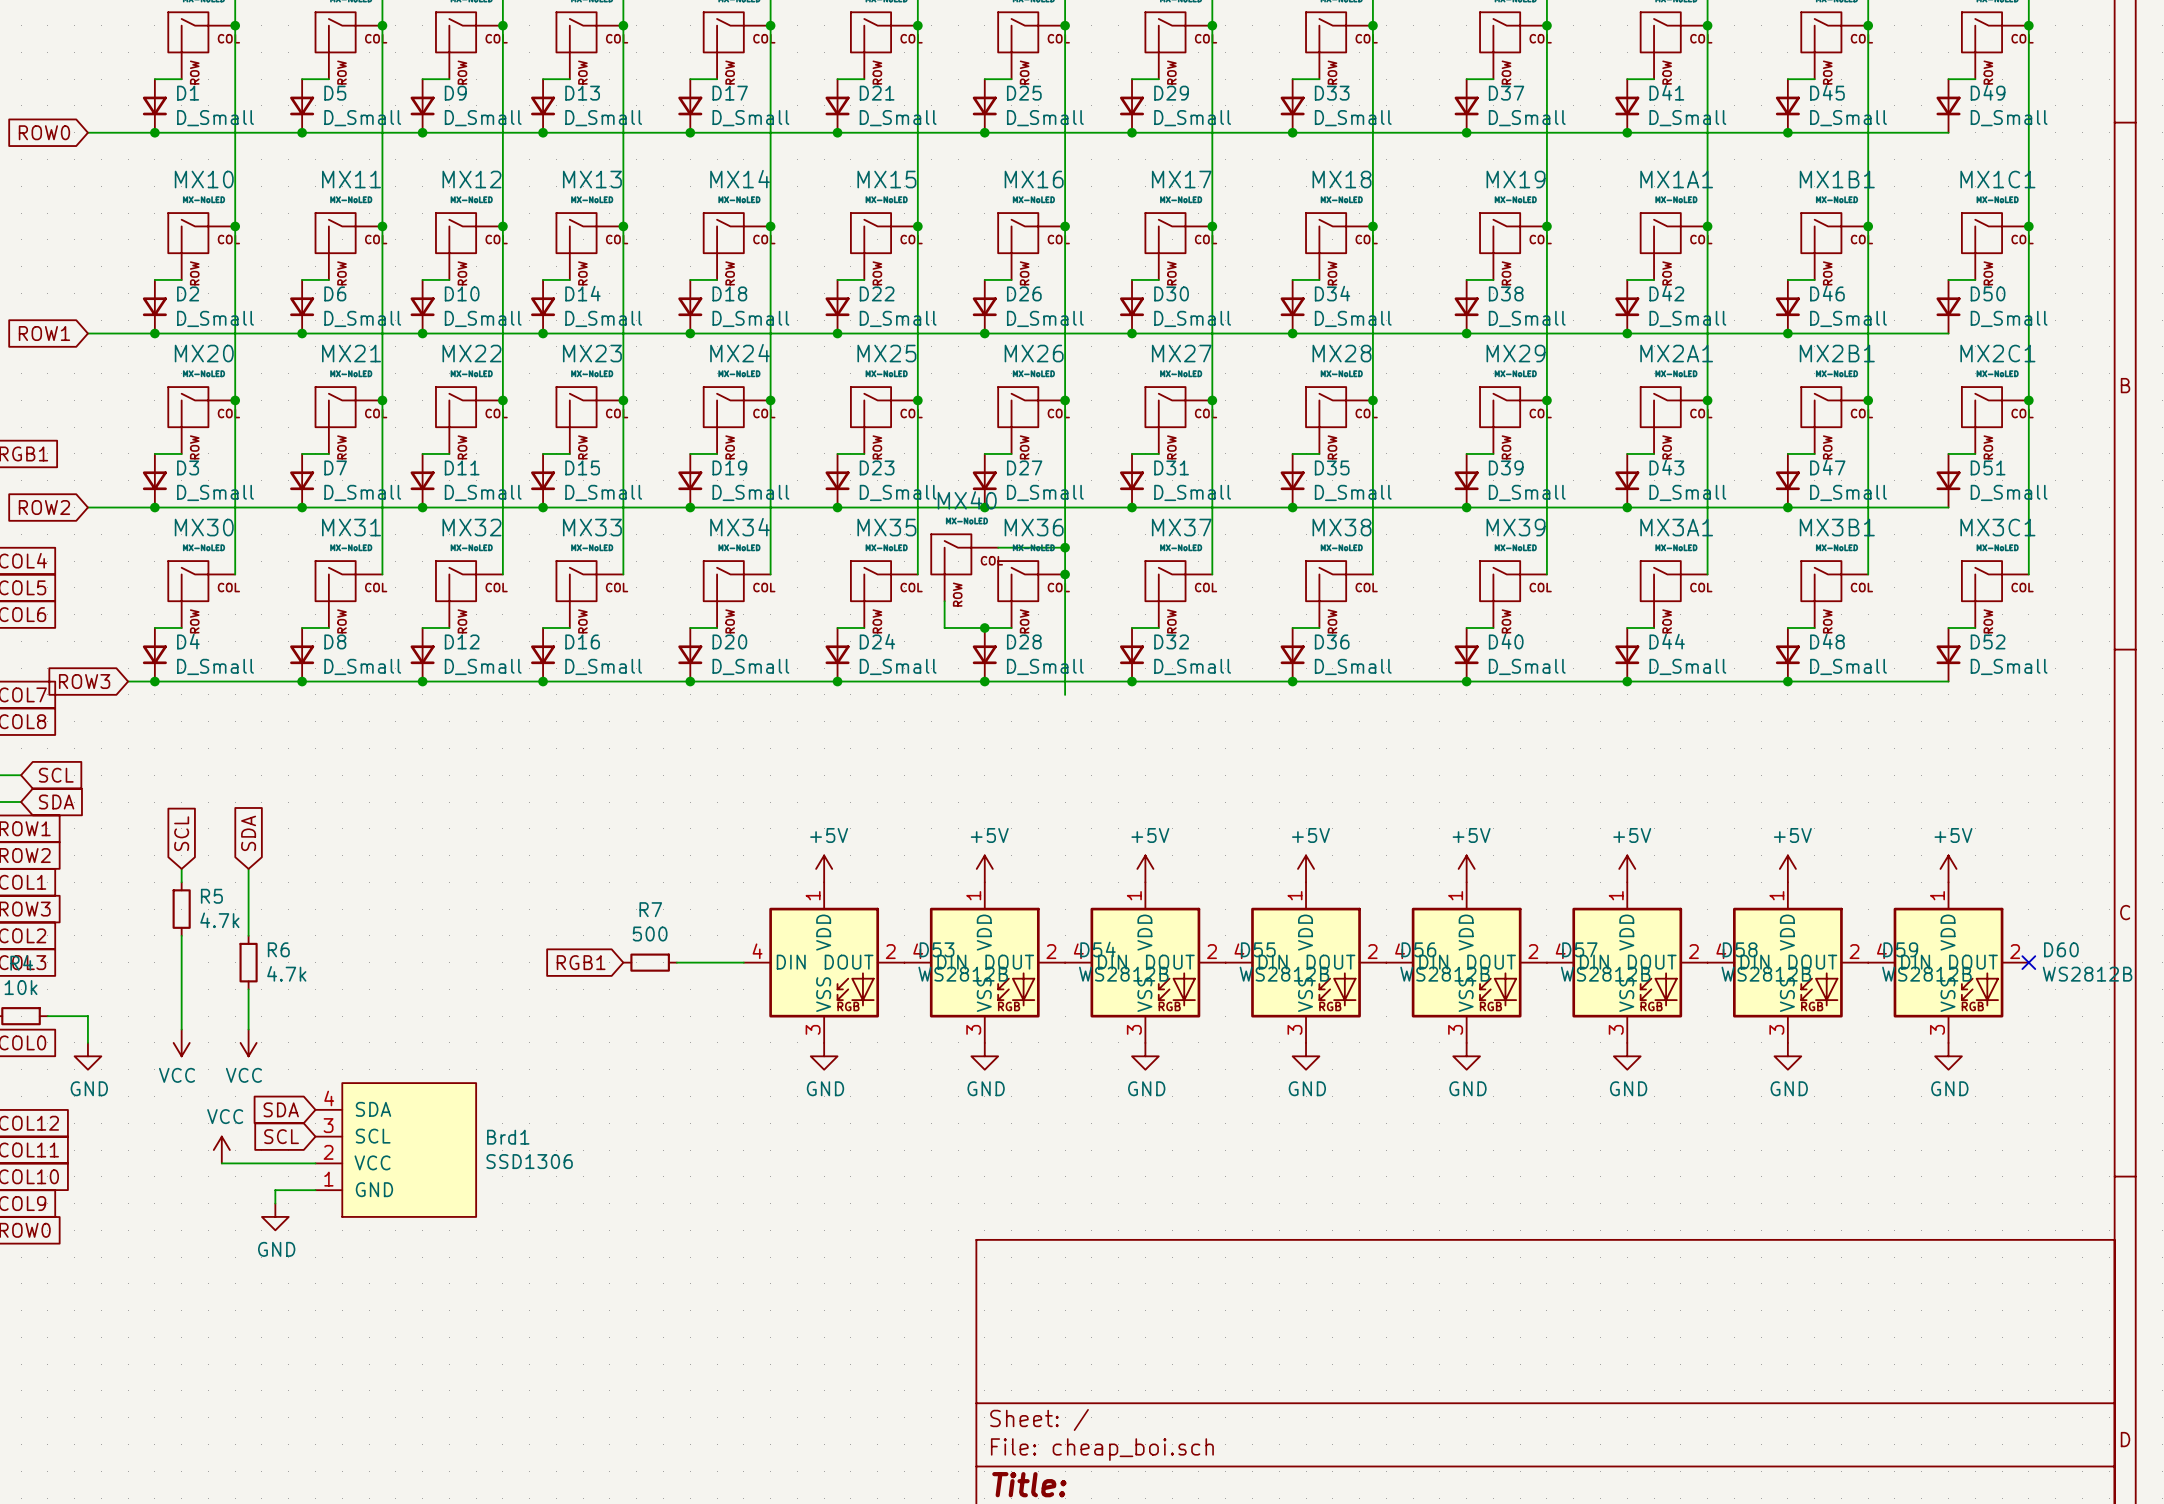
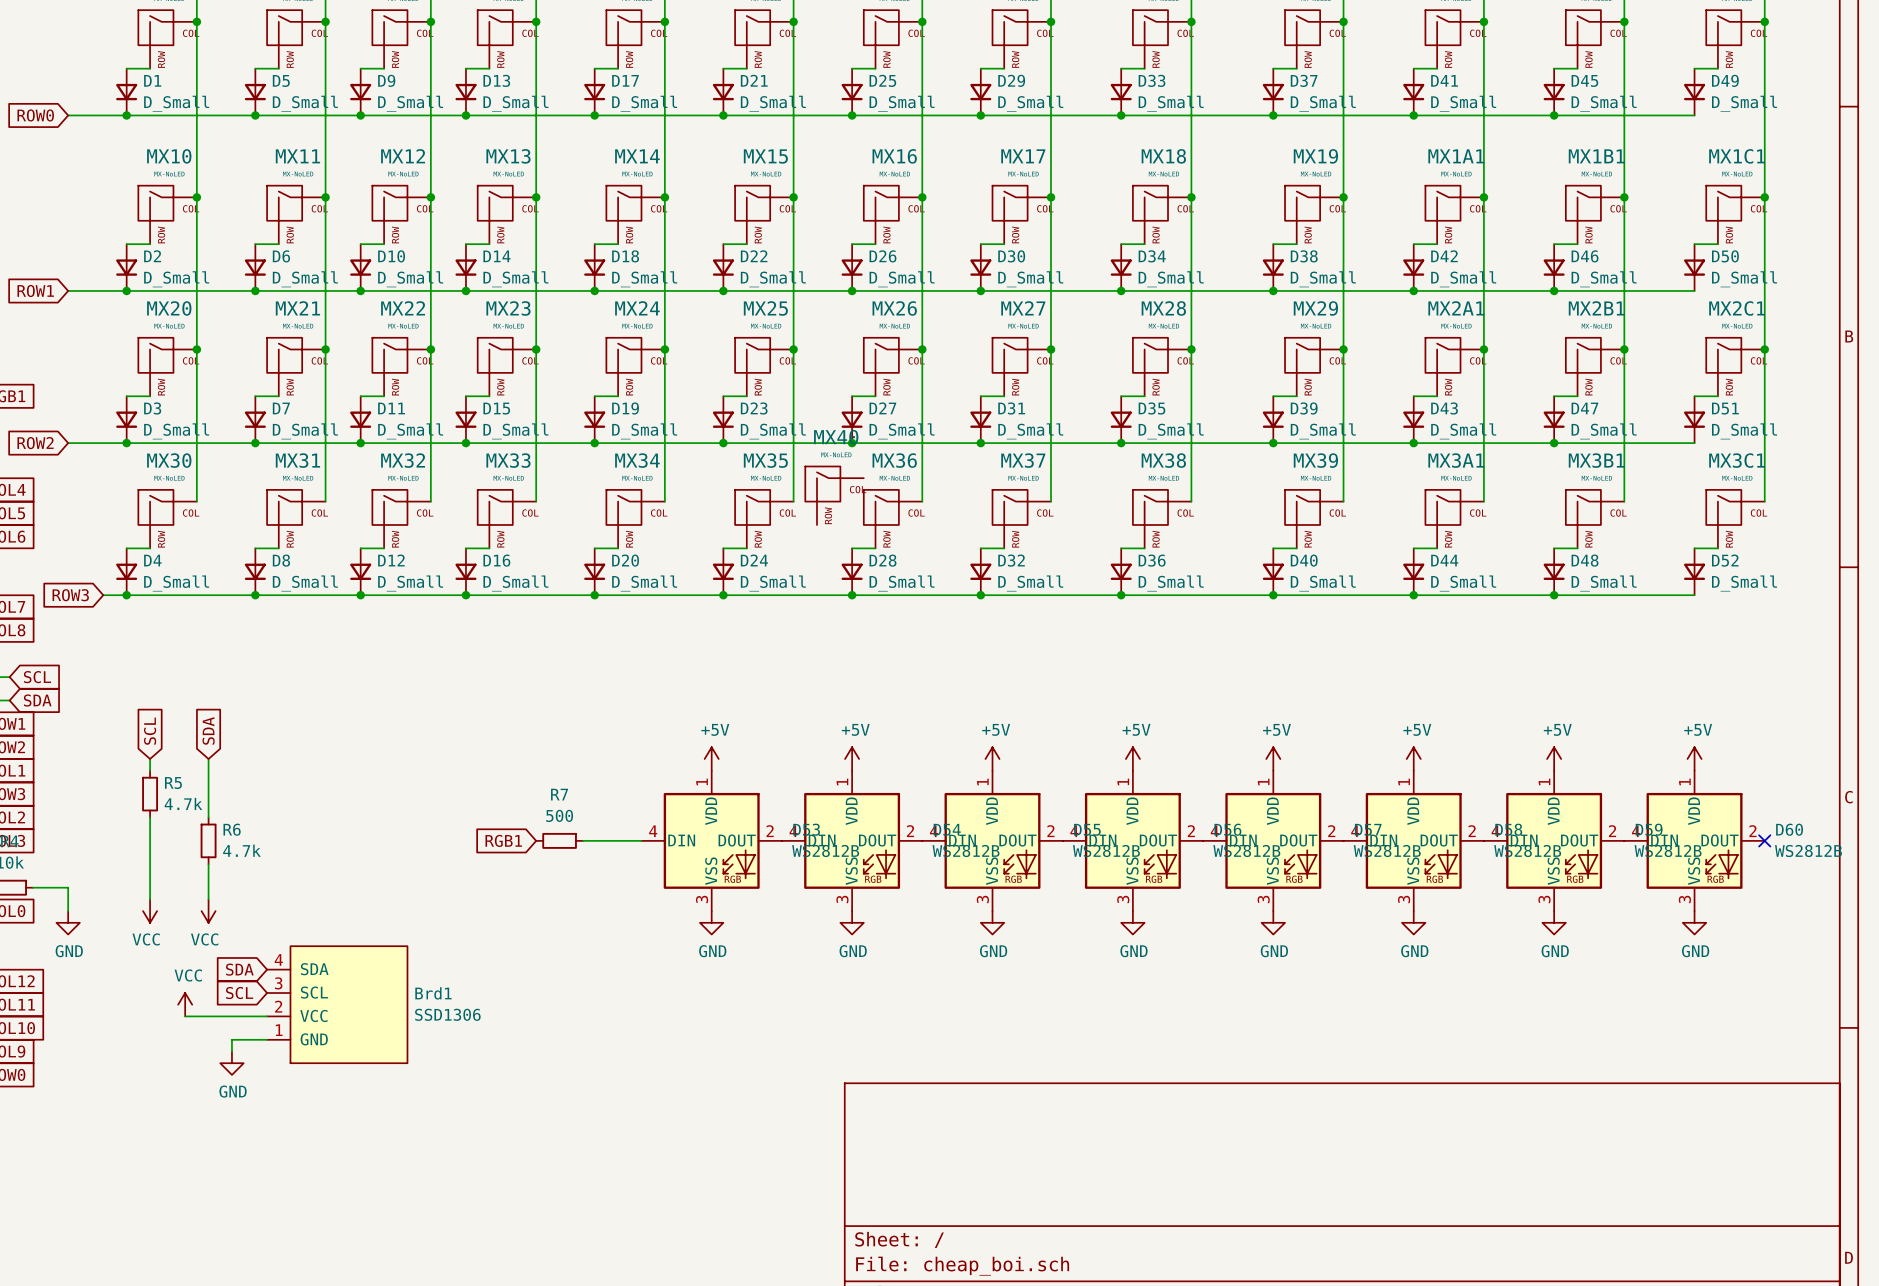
wire: (998, 547) (1065, 547) -> none
junction: (1065, 547) -> none
wire: (1065, 574) (1065, 694) -> none
junction: (1065, 574) -> none
wire: (944, 601) (944, 627) (984, 627) -> none
junction: (984, 627) -> none

